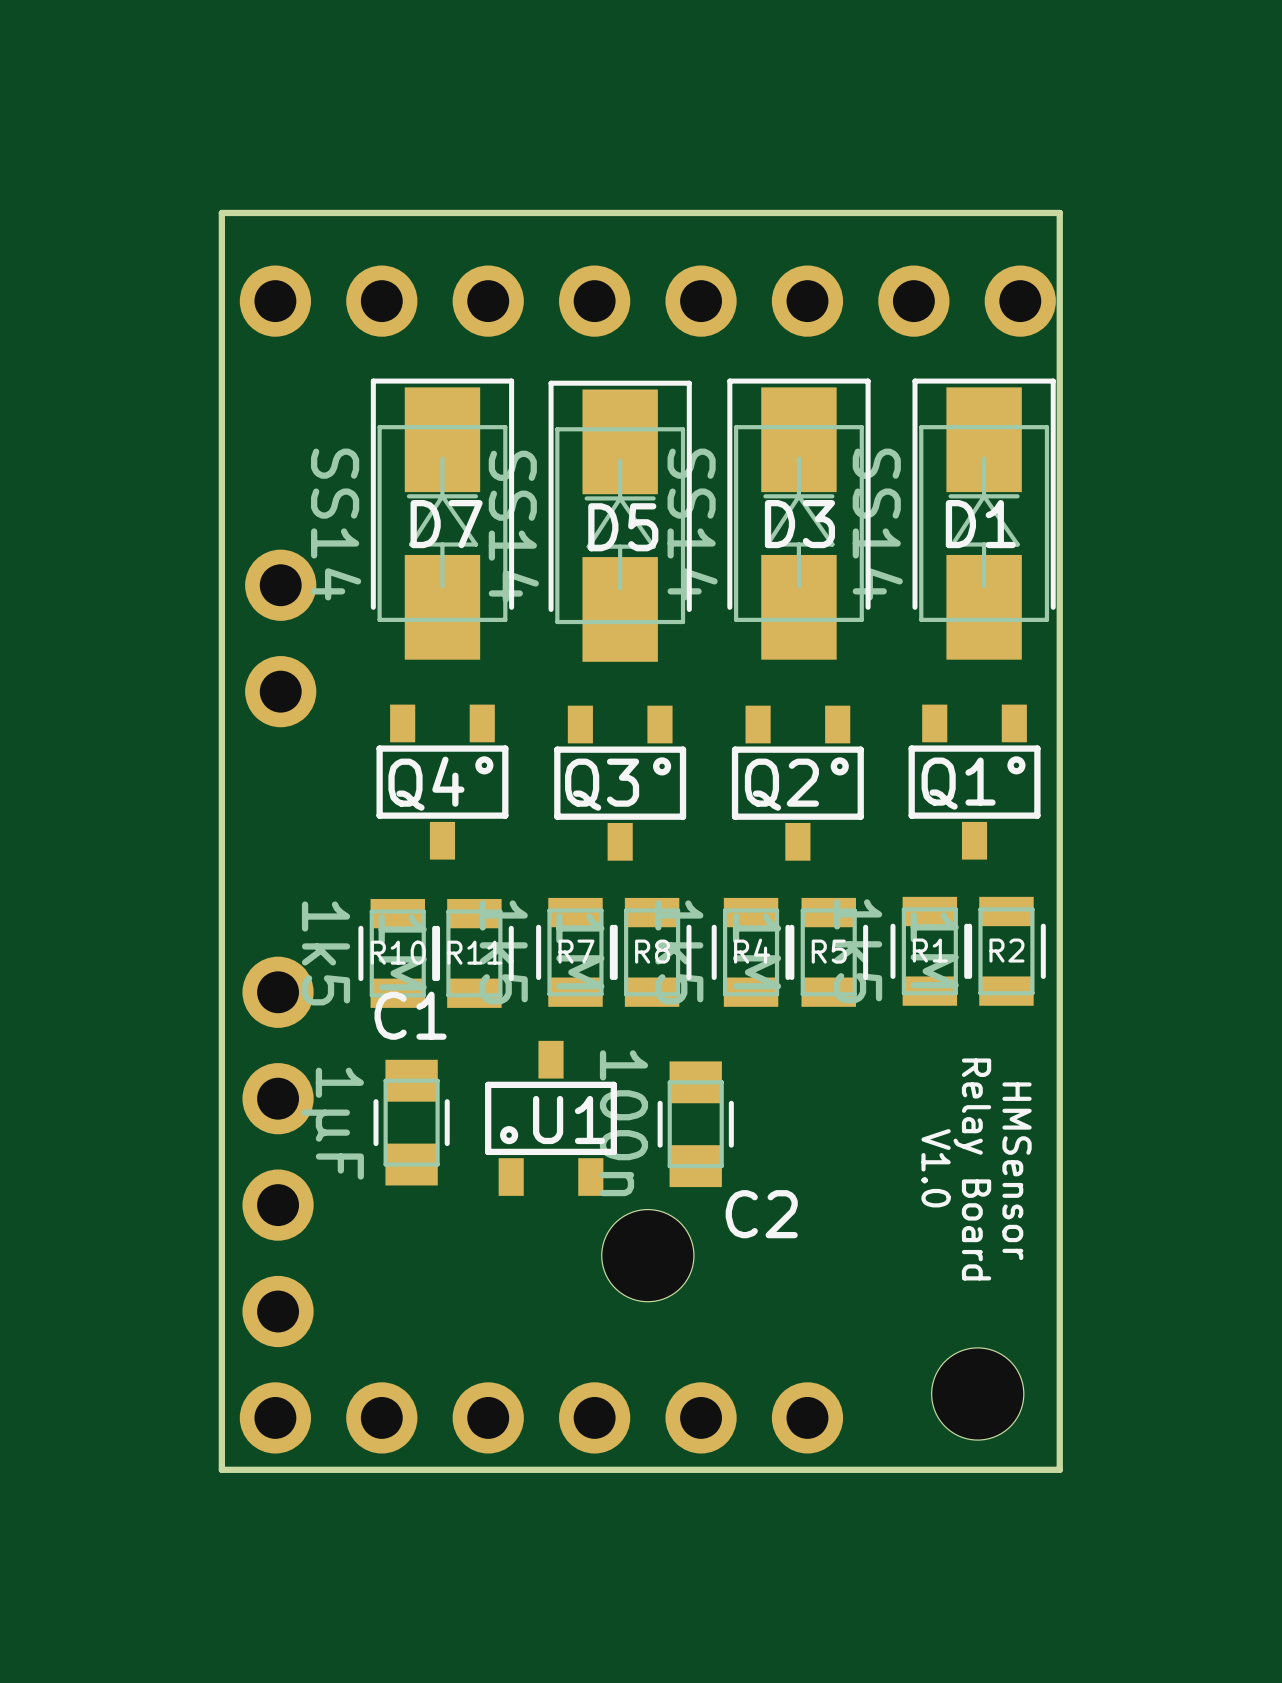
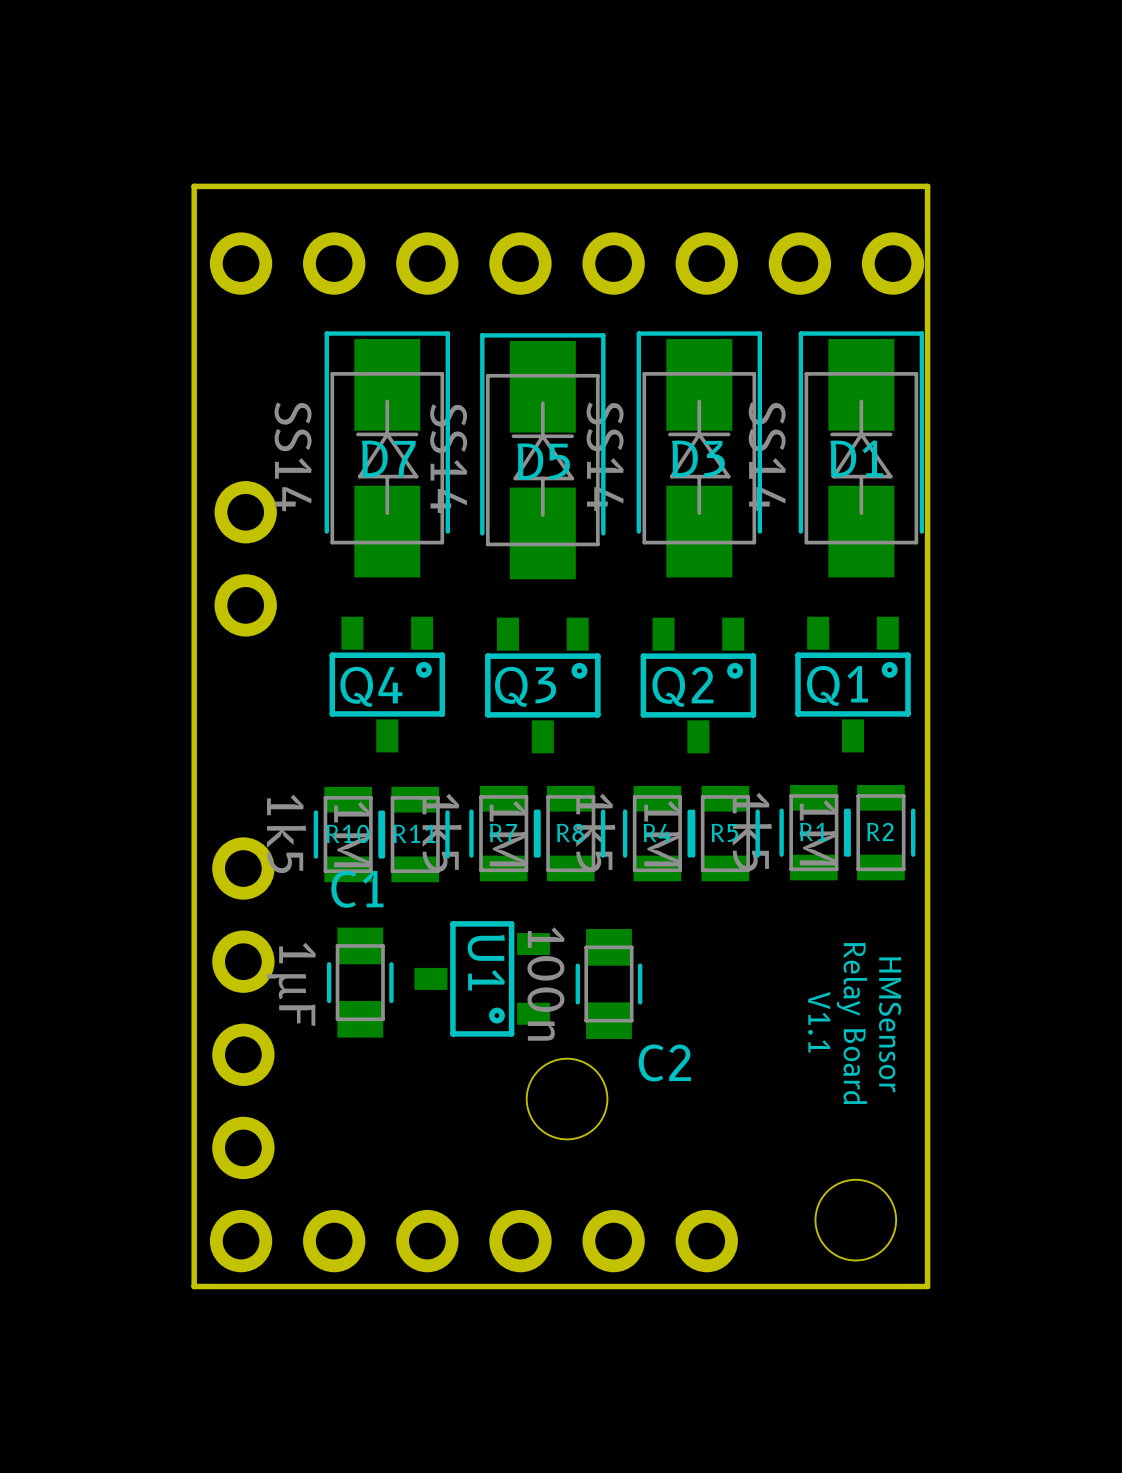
U1 rotation: 0° (551, 1118) -> 90° counterclockwise (482, 978)
text: V1.0 (936, 1168) -> V1.1 (819, 1022)

